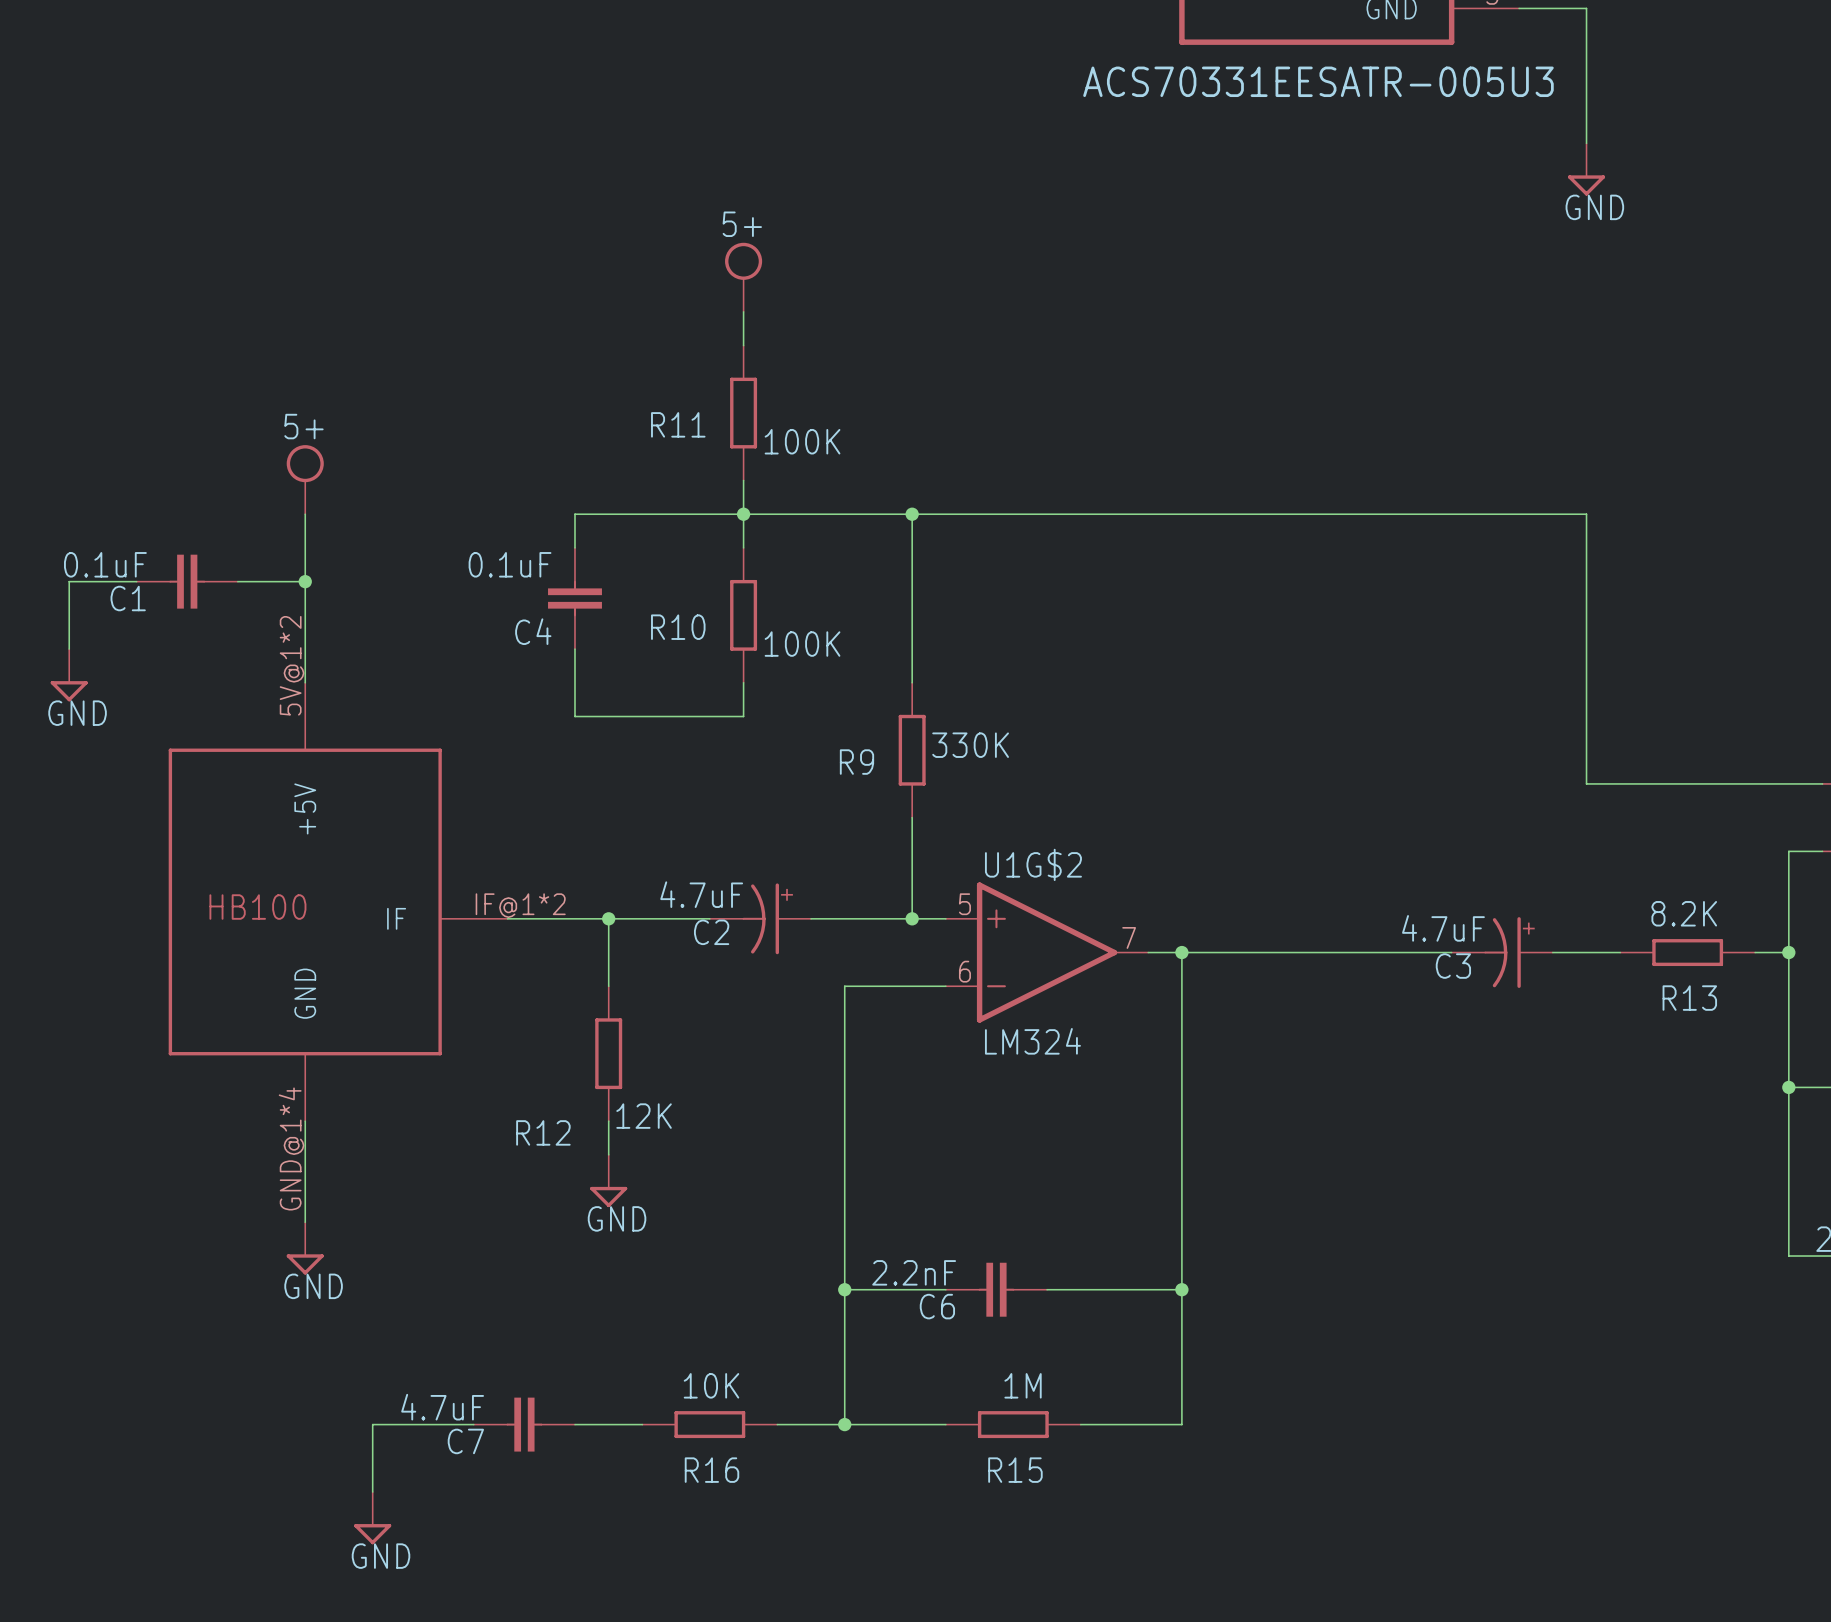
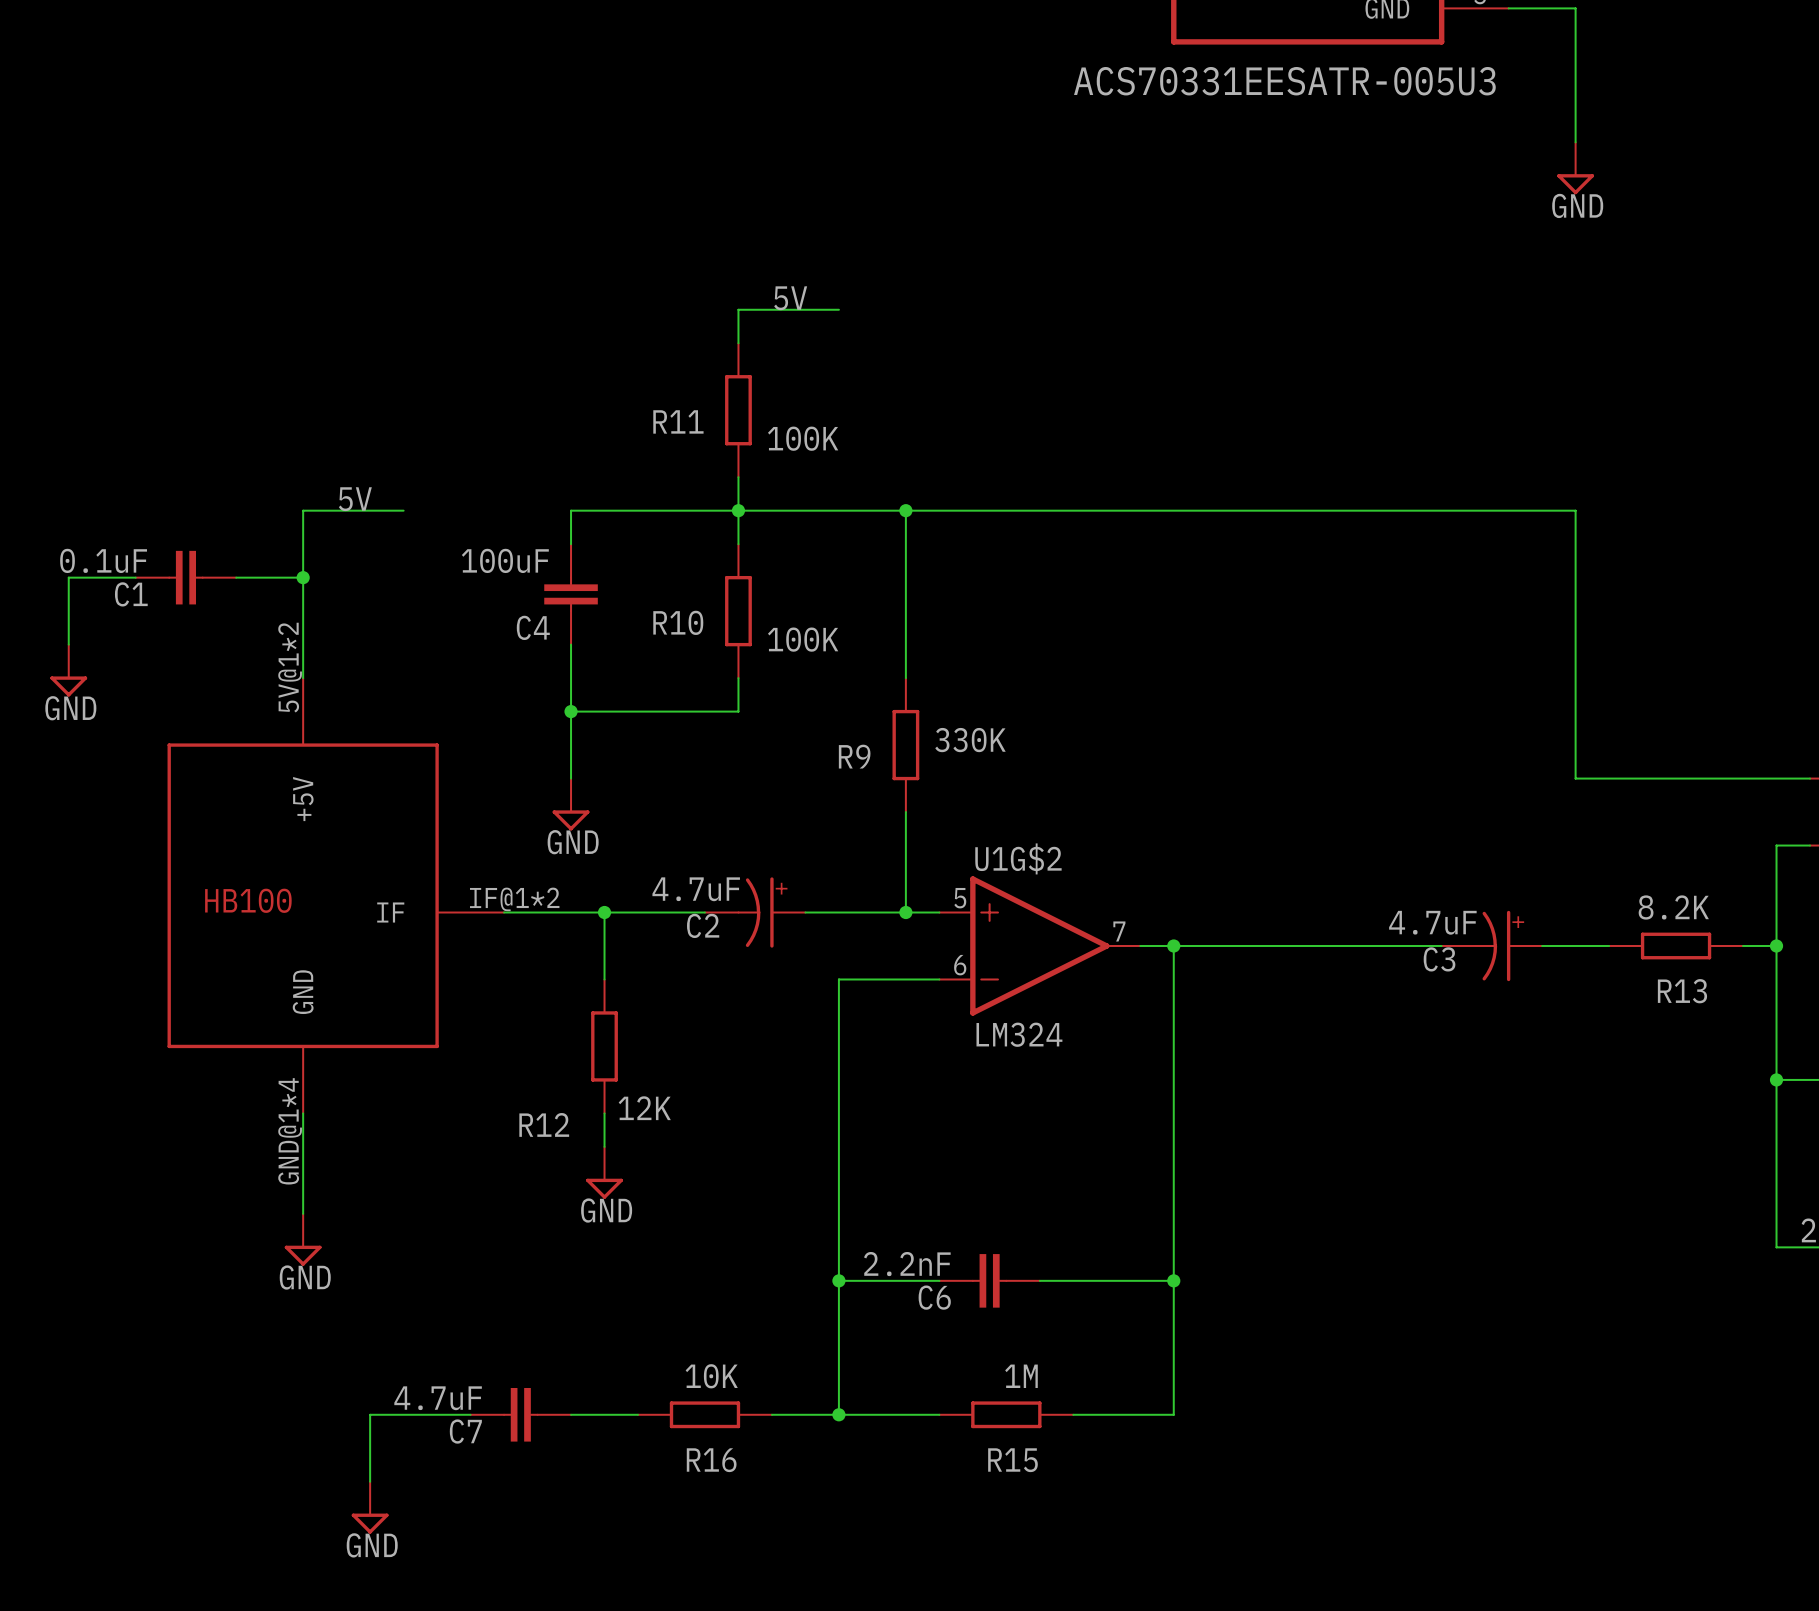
power symbol: 5+ (743, 277) -> none
label: none -> 5V (790, 298)
wire: none -> (738, 309) (838, 309)
power symbol: 5+ (305, 479) -> none
label: none -> 5V (355, 499)
wire: none -> (303, 510) (403, 510)
C4 value: 0.1uF (510, 564) -> 100uF (505, 560)
wire: none -> (571, 711) (571, 778)
junction: none -> (571, 711)
power symbol: none -> GND (571, 804)

